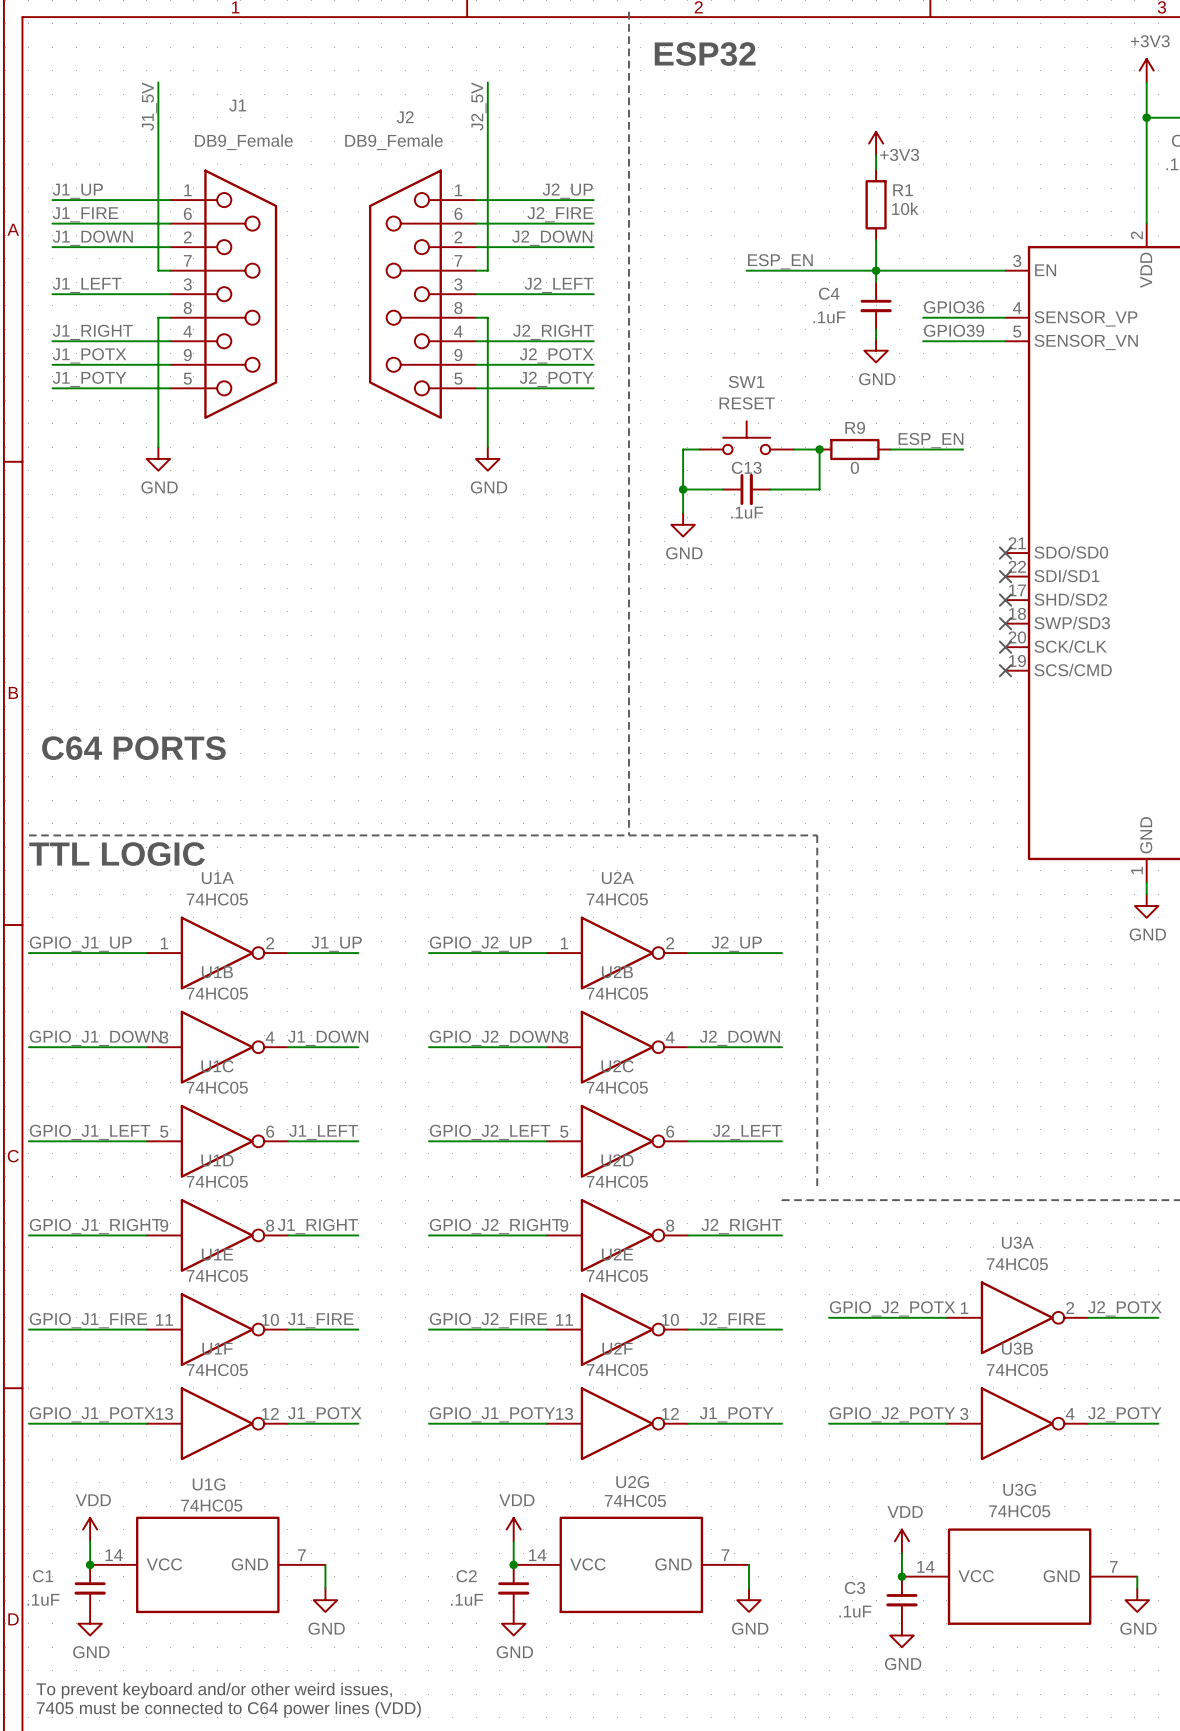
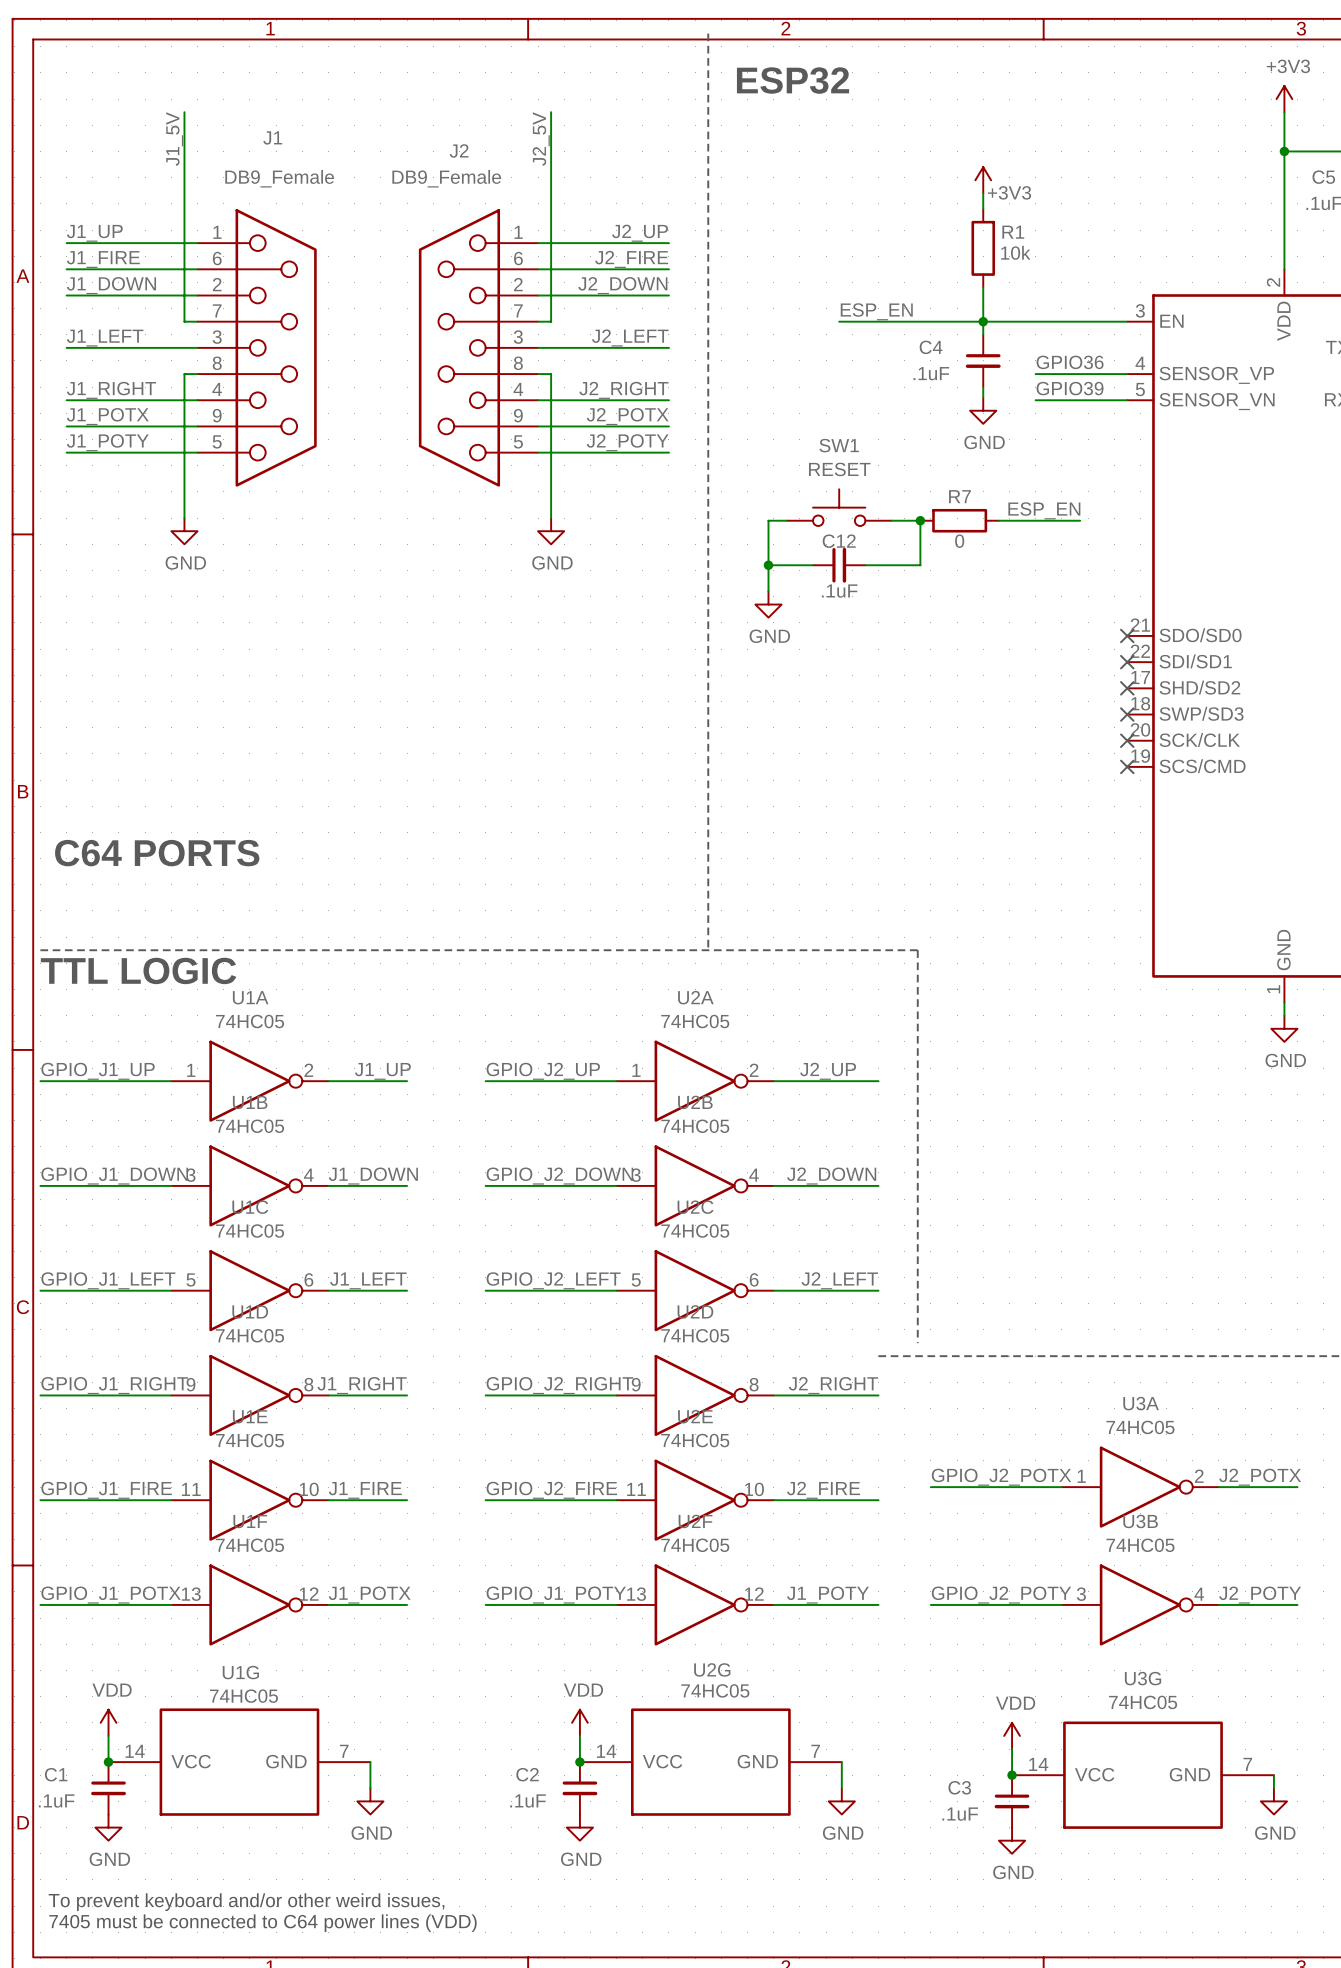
R9 name: R9 (855, 427) -> R7 (959, 496)
C13 name: C13 (746, 467) -> C12 (839, 541)

